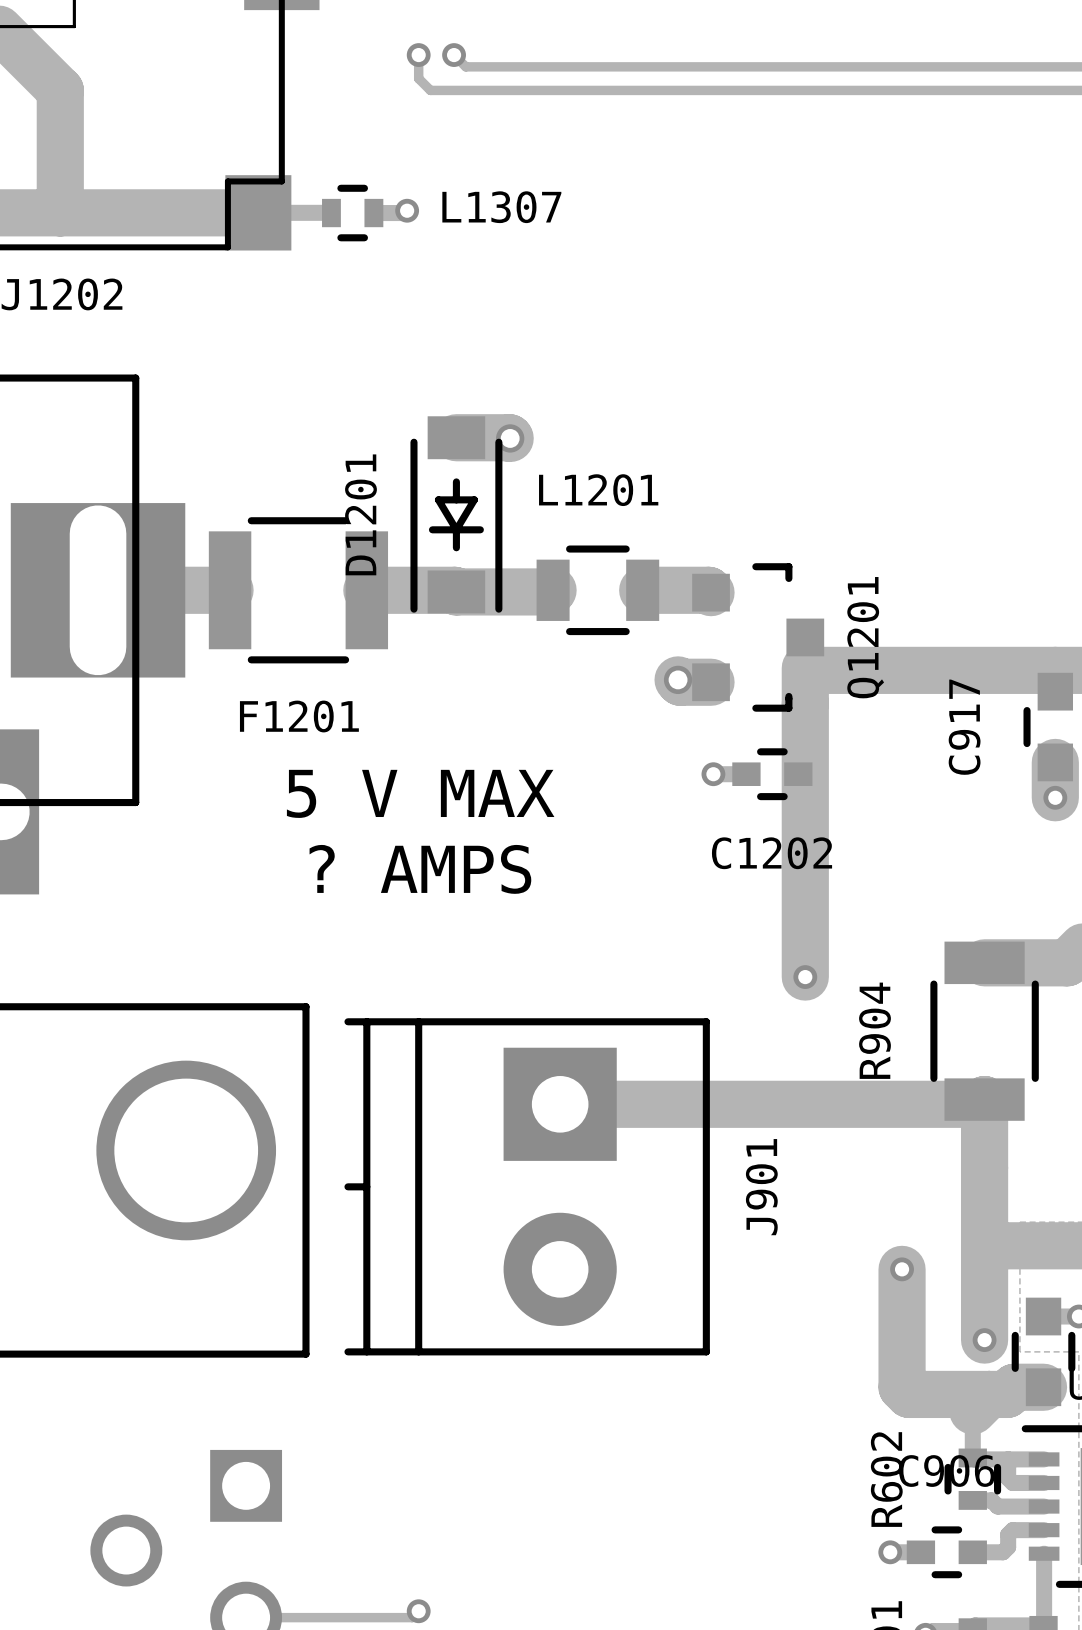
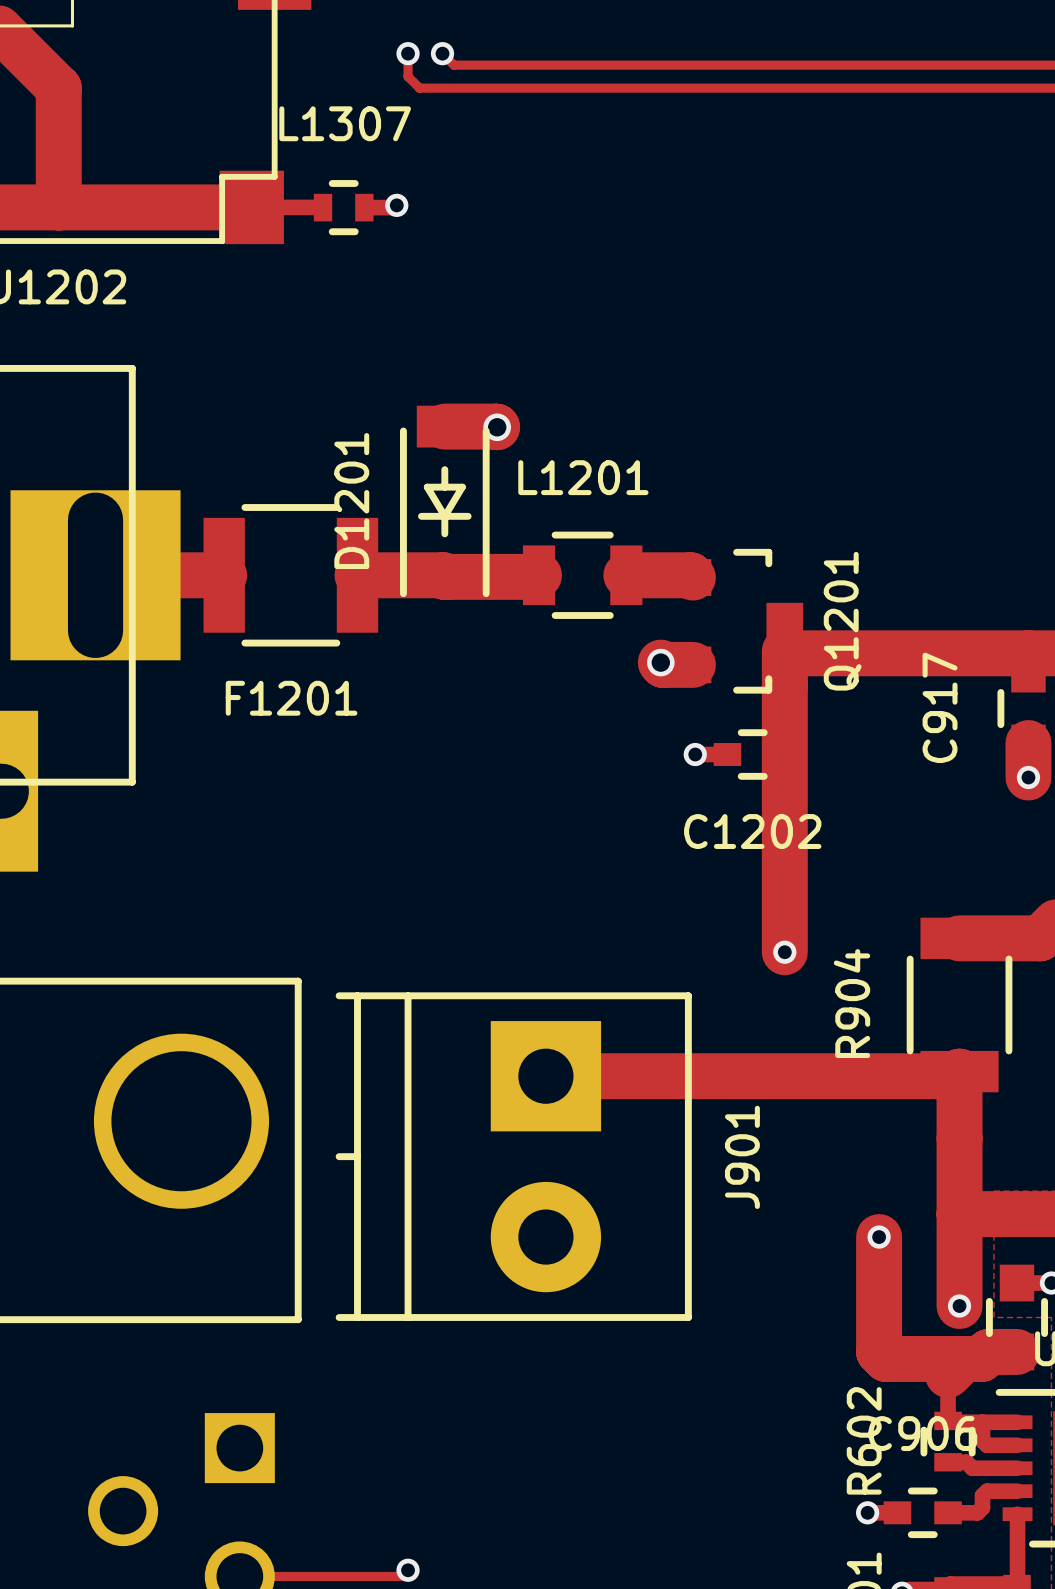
L1307 name position: L1307 (501, 207) -> L1307 (345, 123)
text: 5 V MAX (420, 793) -> none
text: ? AMPS (420, 869) -> none

